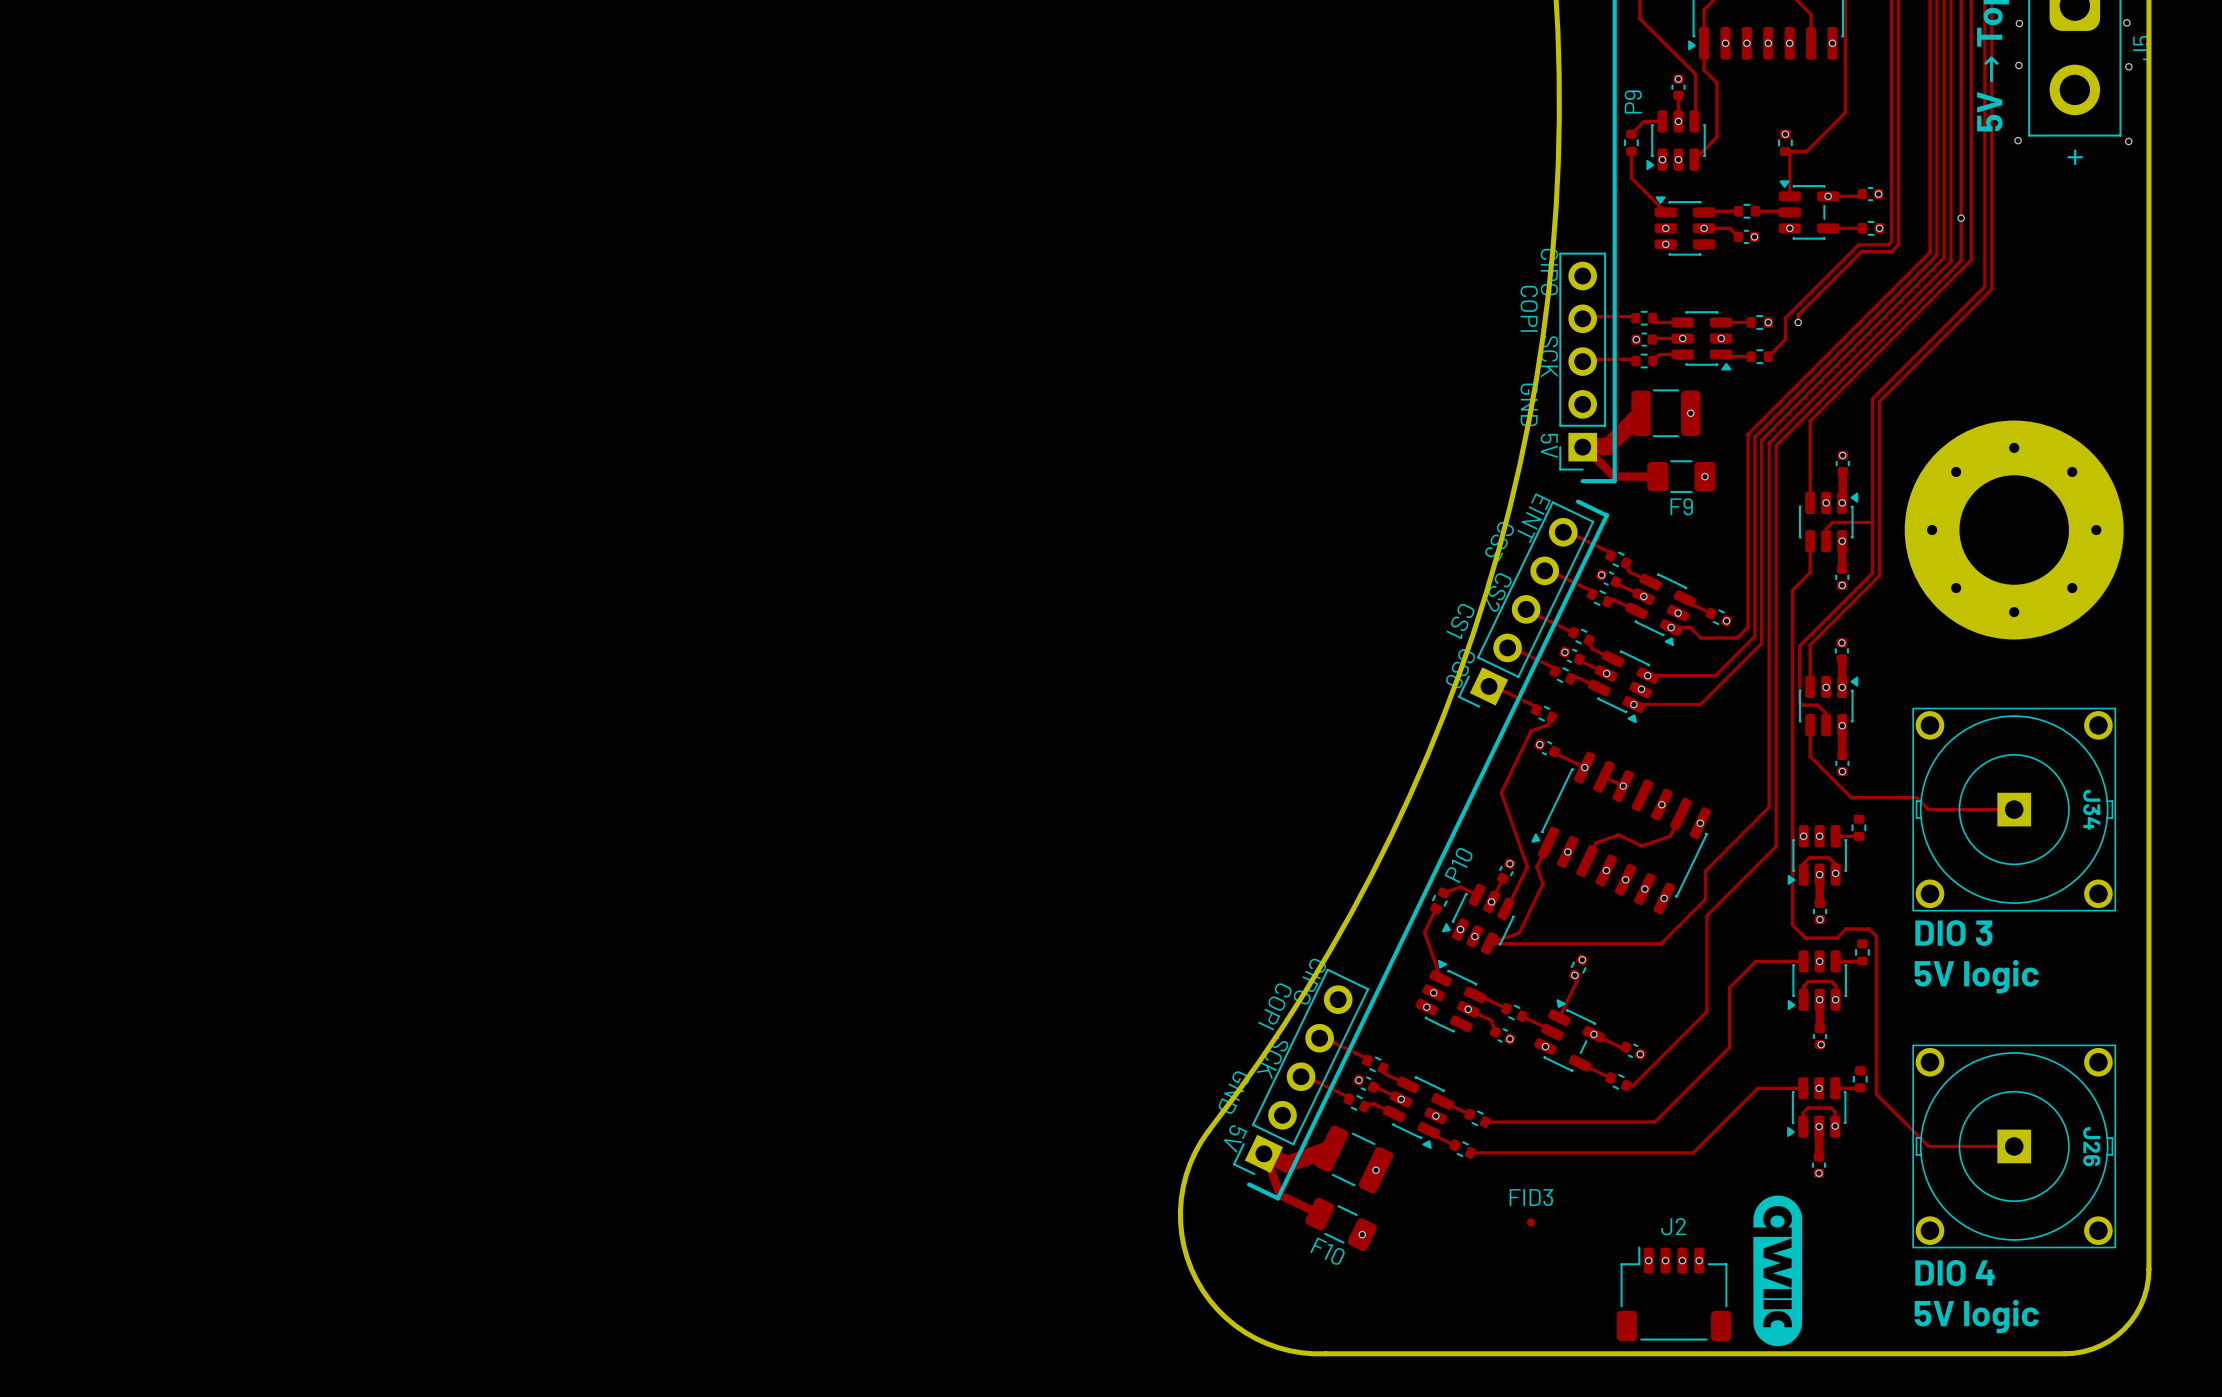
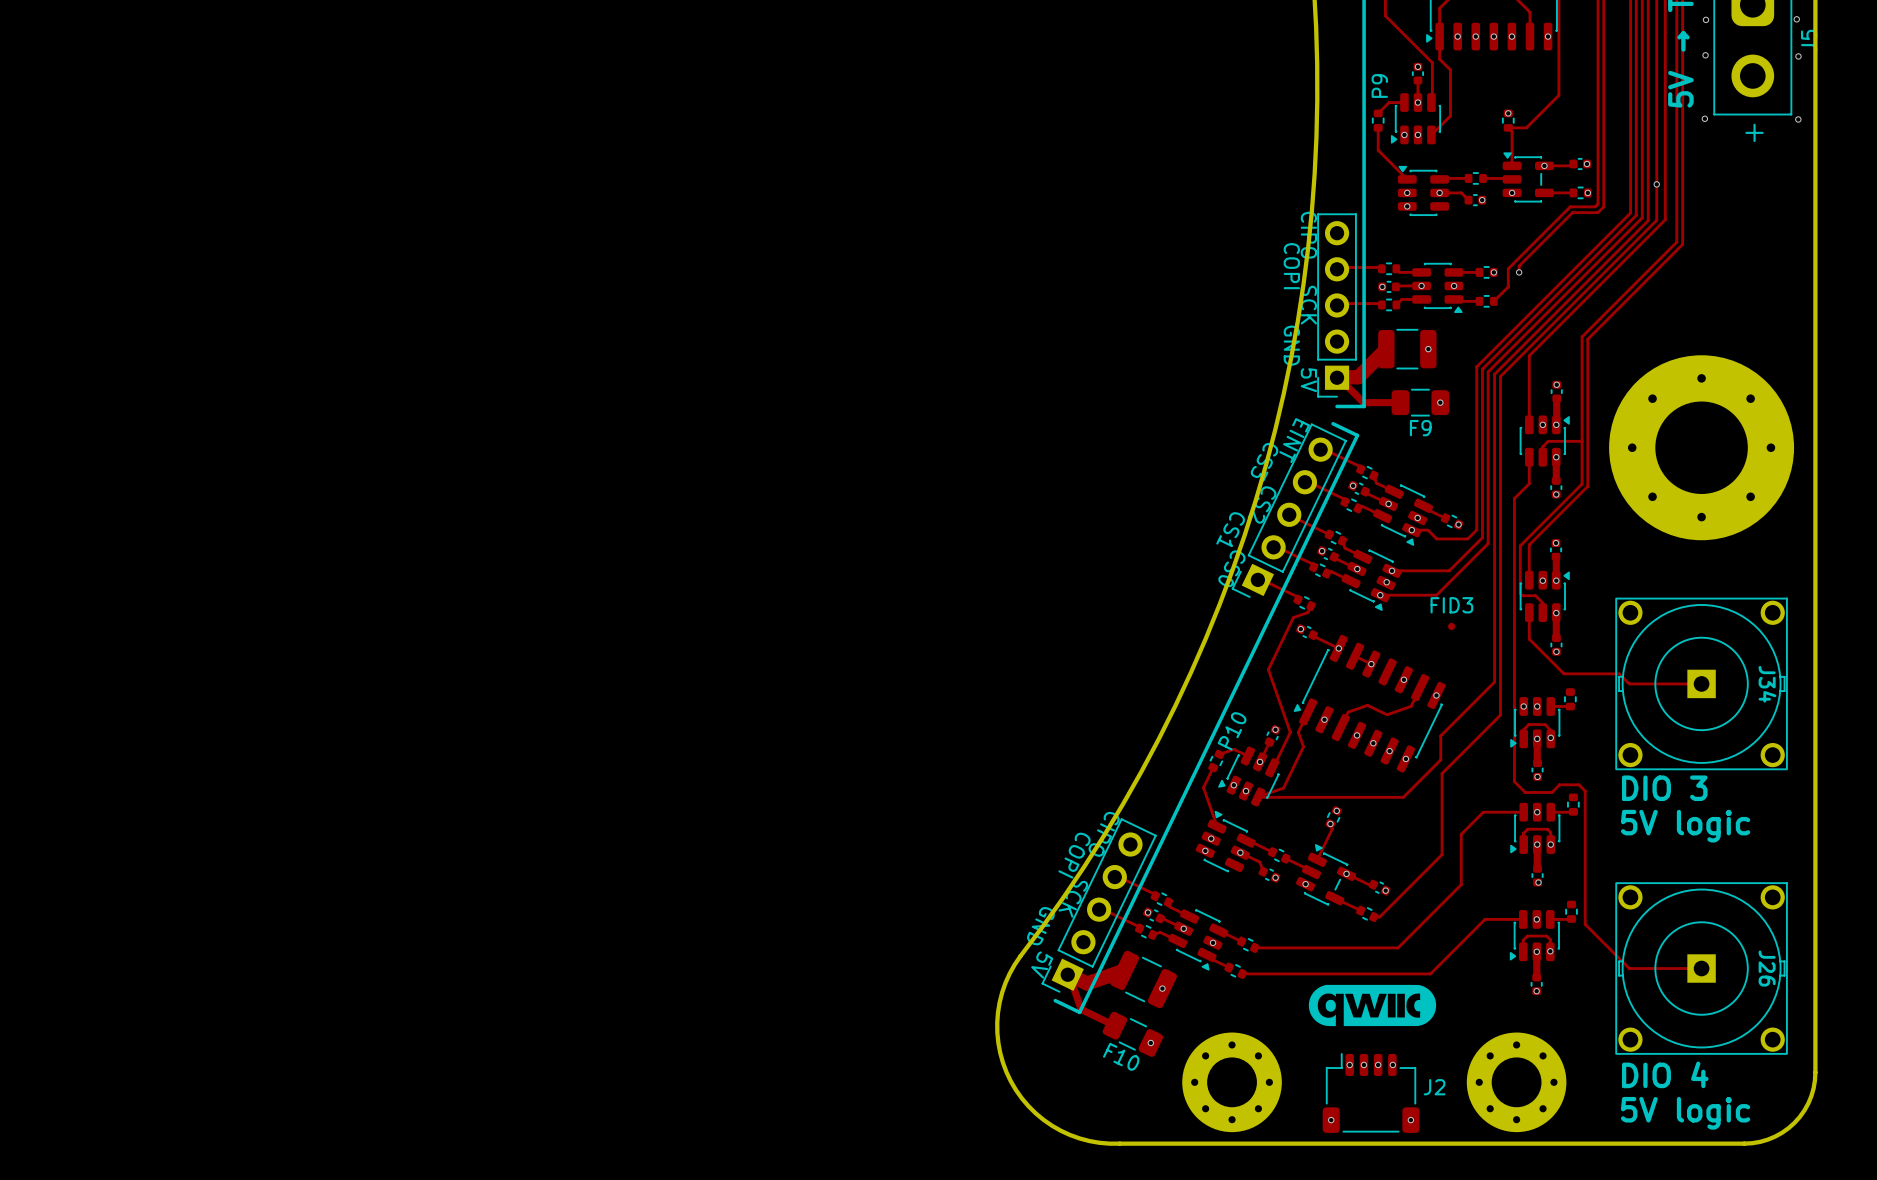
drawing: none -> [1308, 984, 1437, 1027]
drawing: [1753, 1195, 1803, 1347] -> none
FID3 position: (1530, 1222) -> (1451, 626)
J2 name position: J2 (1673, 1226) -> J2 (1434, 1087)
via: none -> (1349, 1064)
via: none -> (1363, 1064)
via: none -> (1378, 1064)
via: (1665, 1260) -> none
via: (1682, 1260) -> none
via: (1699, 1260) -> none
part: none -> (1232, 1082)
part: none -> (1516, 1082)
J2 position: (1673, 1293) -> (1371, 1093)
via: none -> (1331, 1120)
via: none -> (1410, 1120)

